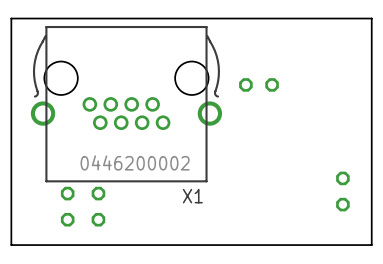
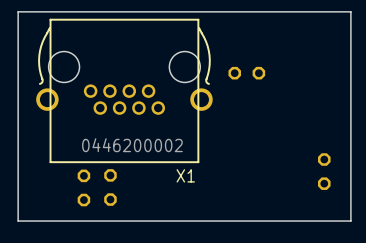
part: (67, 206) -> none
part: (98, 206) -> none
part: none -> (110, 187)
part: none -> (83, 187)

